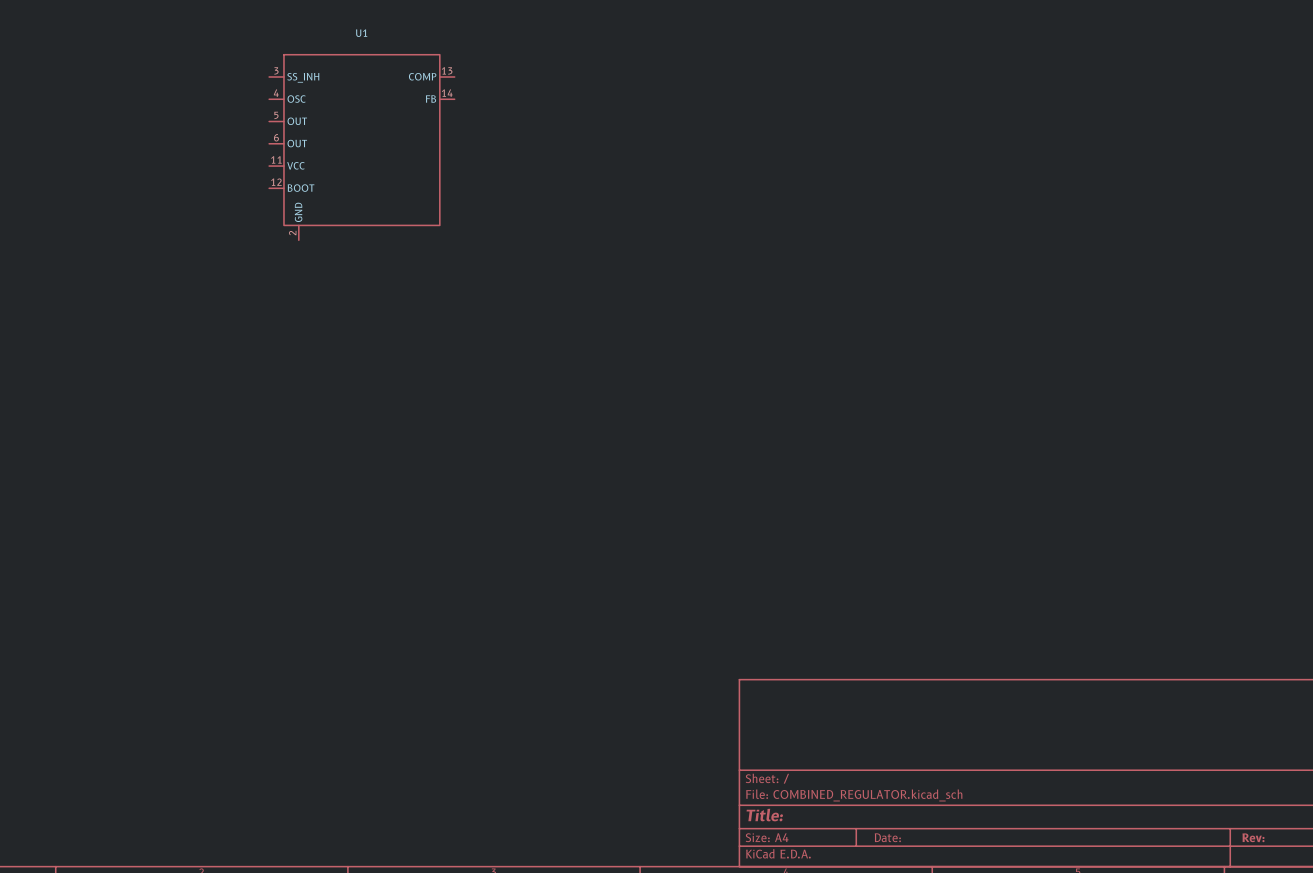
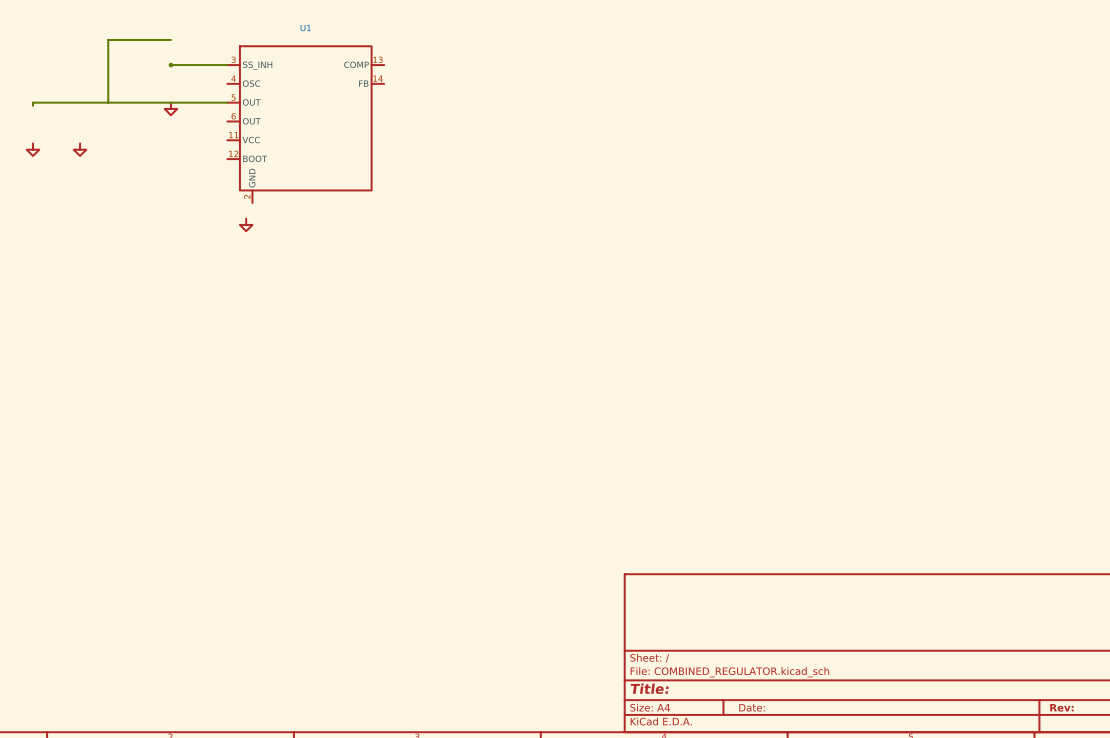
wire: none -> (170, 39) (108, 39) (108, 102)
wire: none -> (170, 65) (227, 65)
junction: none -> (170, 65)
wire: none -> (227, 102) (33, 102) (33, 105)
power symbol: none -> (170, 108)
power symbol: none -> (33, 149)
power symbol: none -> (80, 149)
power symbol: none -> (246, 224)

